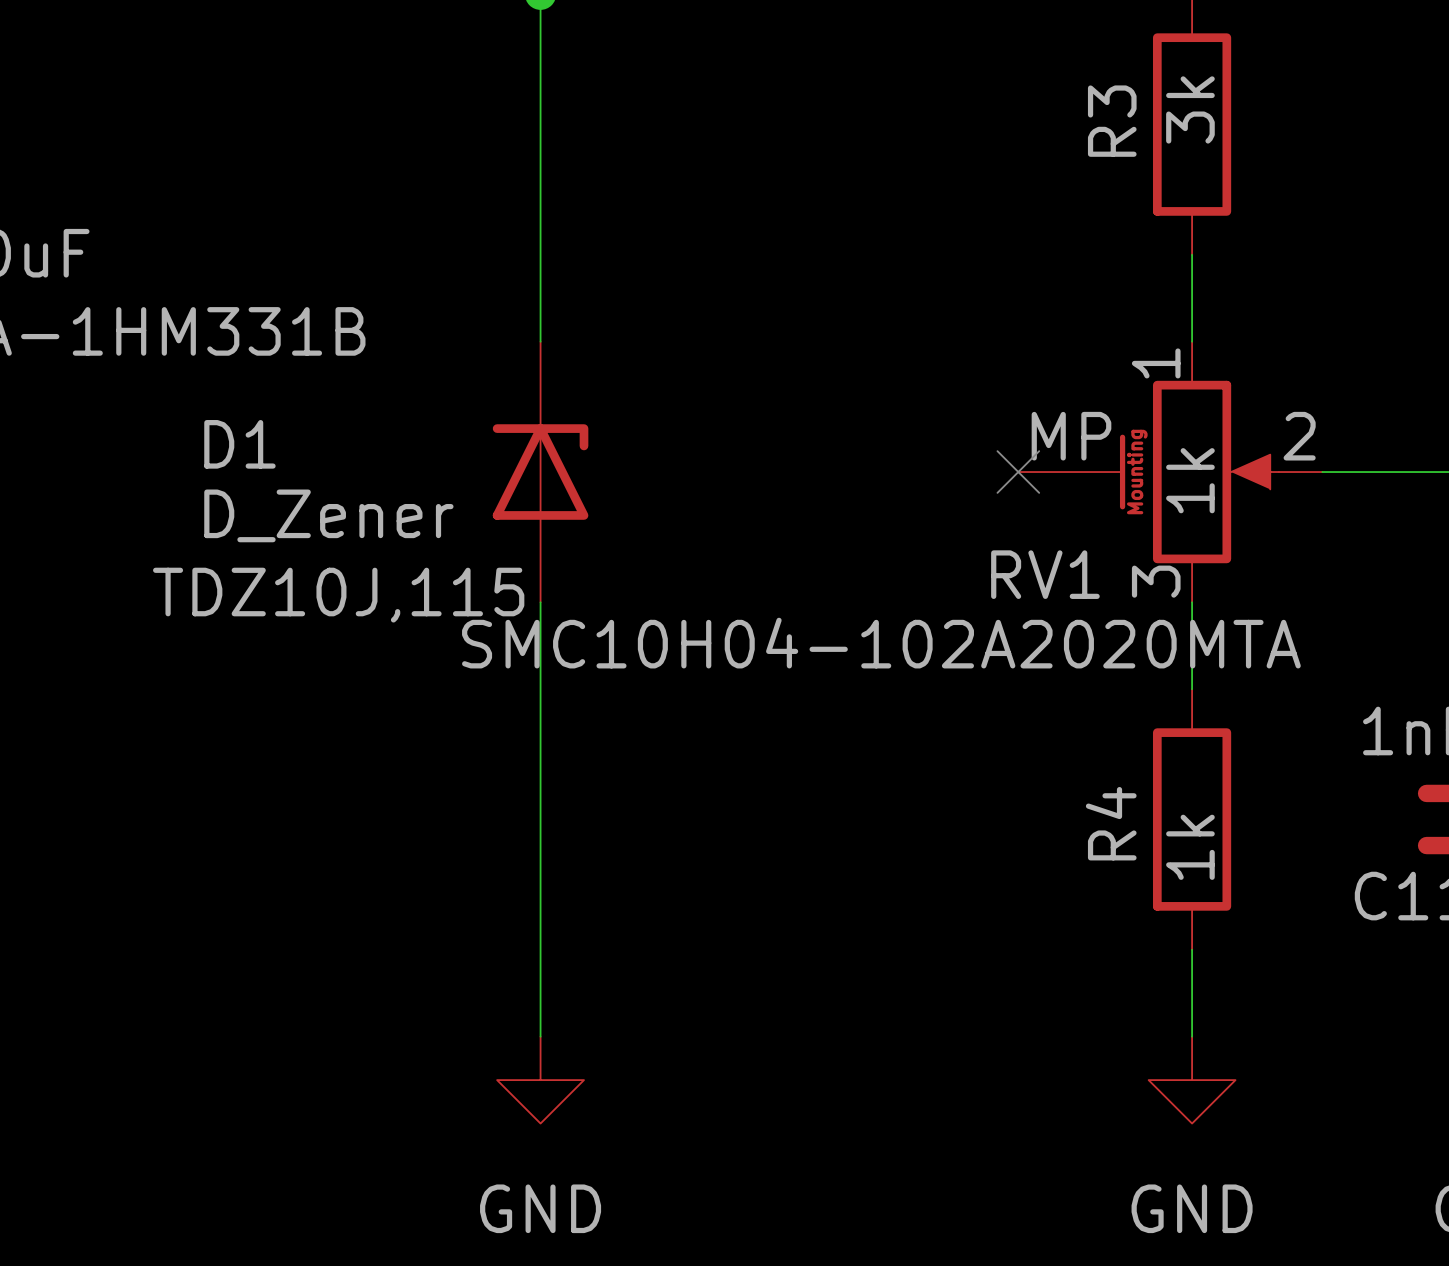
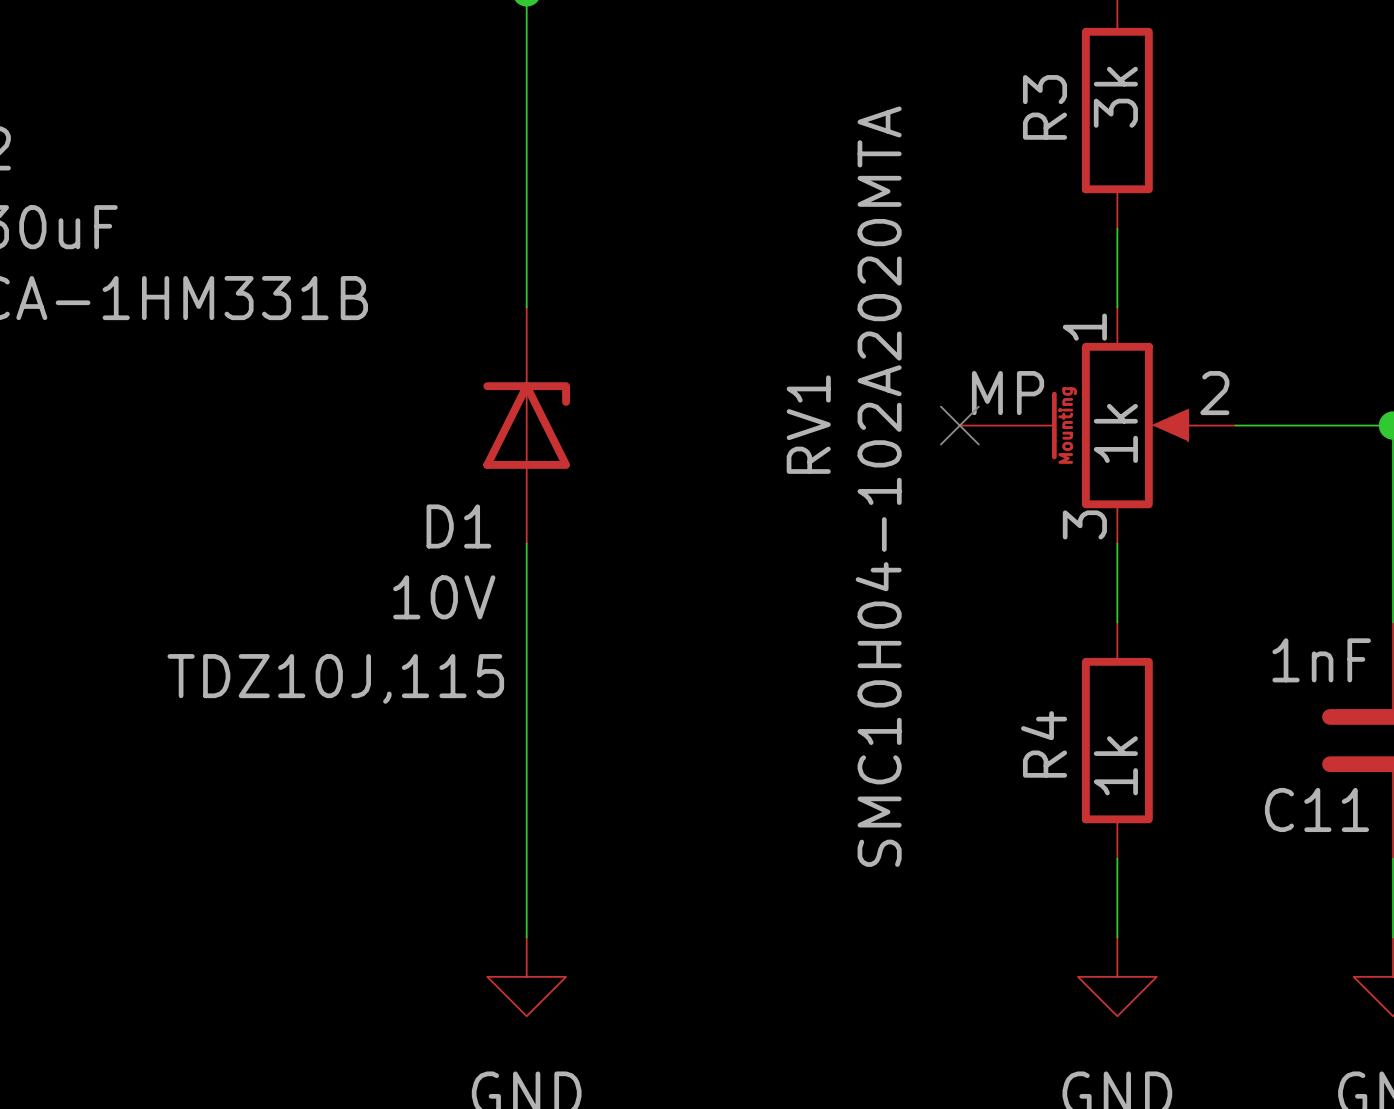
D1 name position: D1 (239, 444) -> D1 (458, 526)
D1 value: D_Zener (328, 515) -> 10V (444, 597)
RV1 name rotation: 0° (1045, 574) -> 90° counterclockwise (808, 424)
RV1 name position: RV1 (1045, 574) -> RV1 (808, 424)
D1 text position: TDZ10J,115 (338, 595) -> TDZ10J,115 (335, 678)
RV1 text rotation: 0° (881, 643) -> 90° counterclockwise (878, 486)

